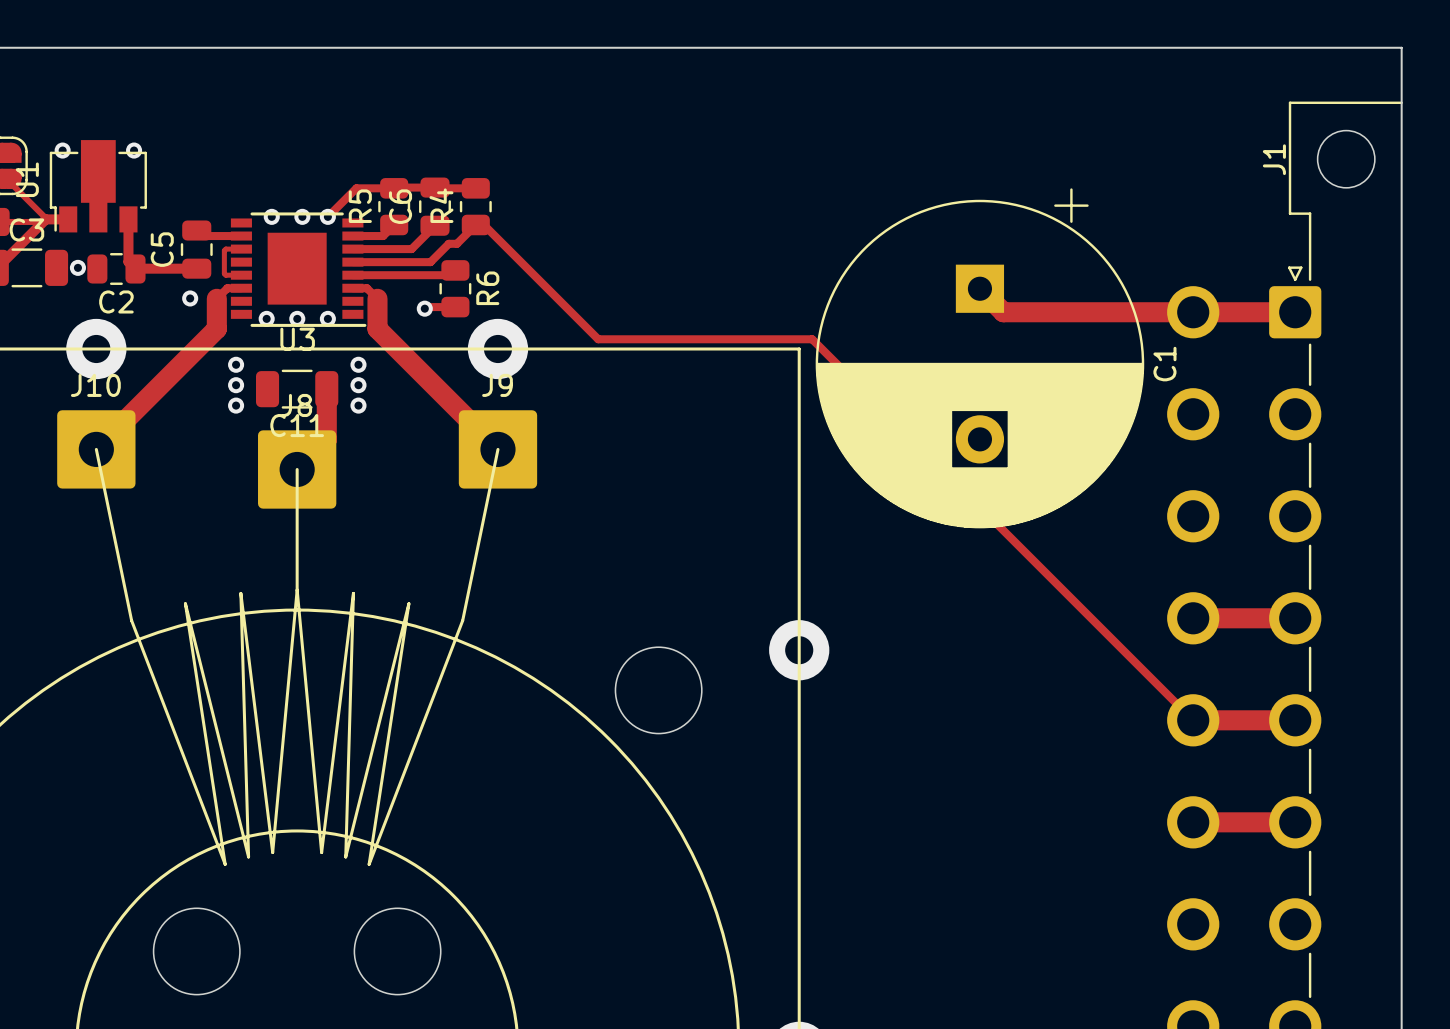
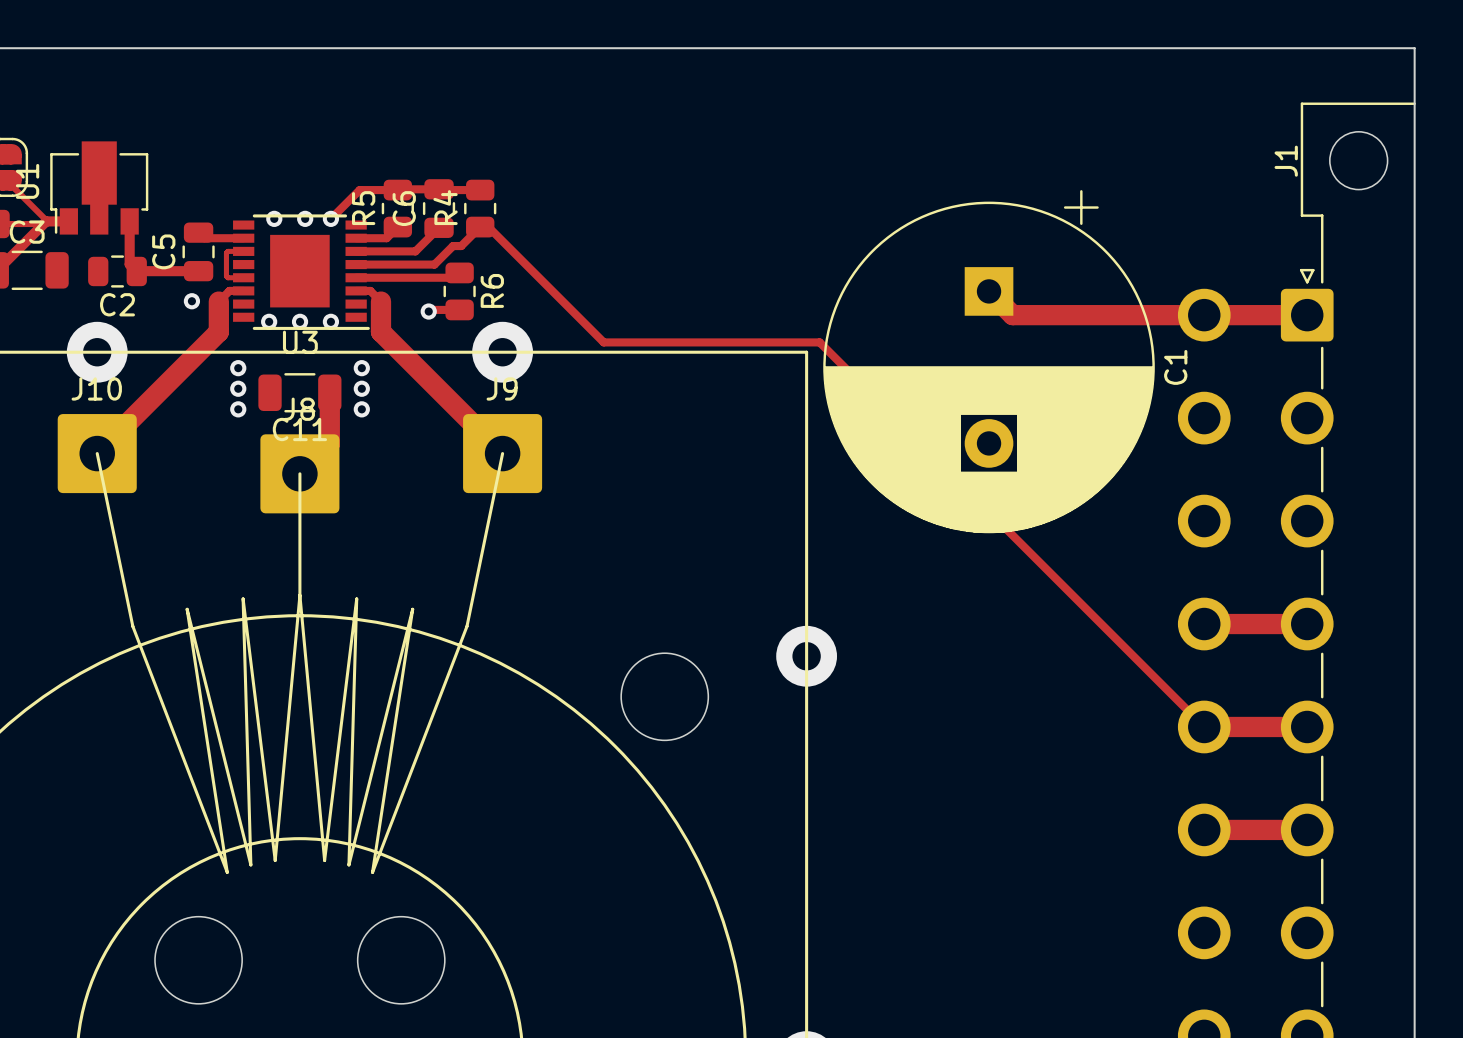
via: (62, 150) -> none
via: (134, 150) -> none
via: (77, 267) -> none

